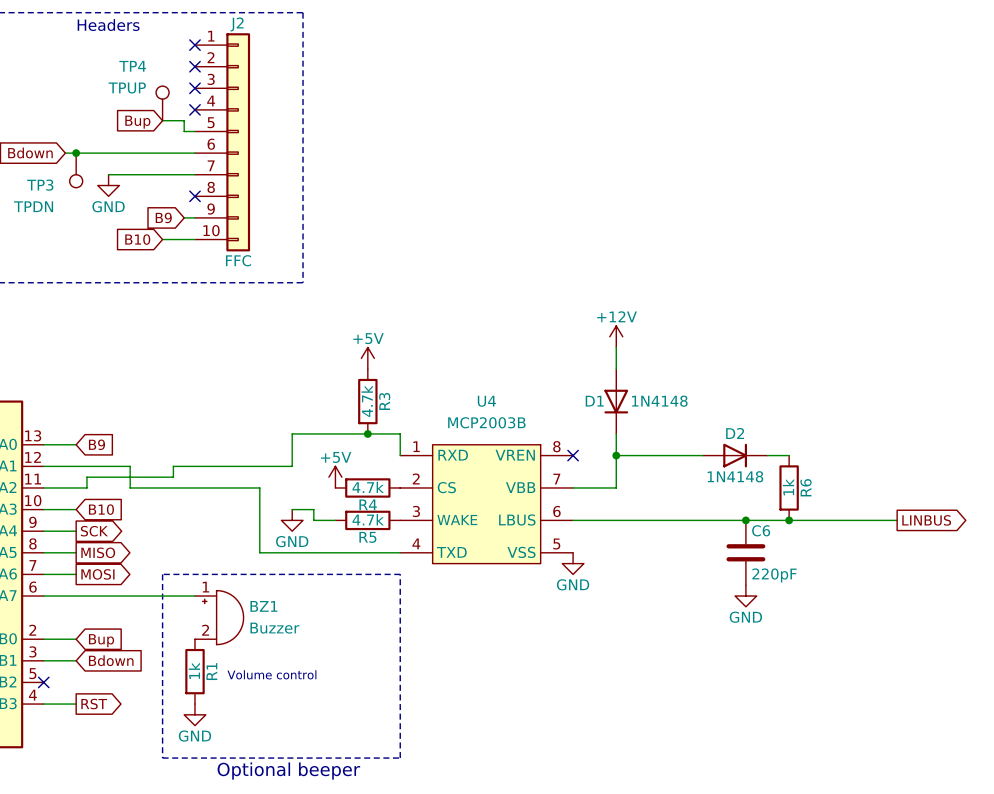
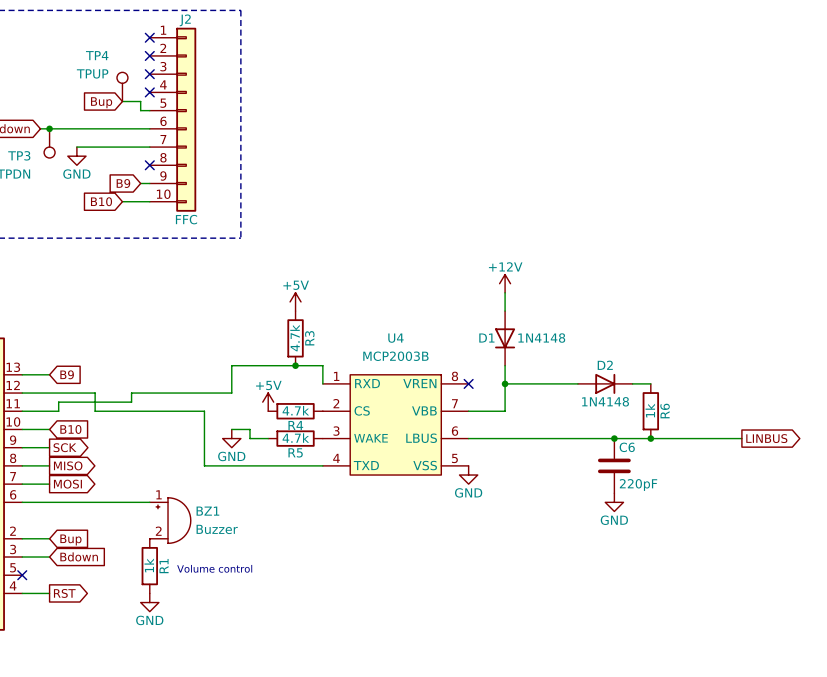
text: Headers (108, 25) -> none
line: (162, 574) (400, 574) (400, 758) (162, 758) (162, 574) -> none
text: Optional beeper (288, 771) -> none

